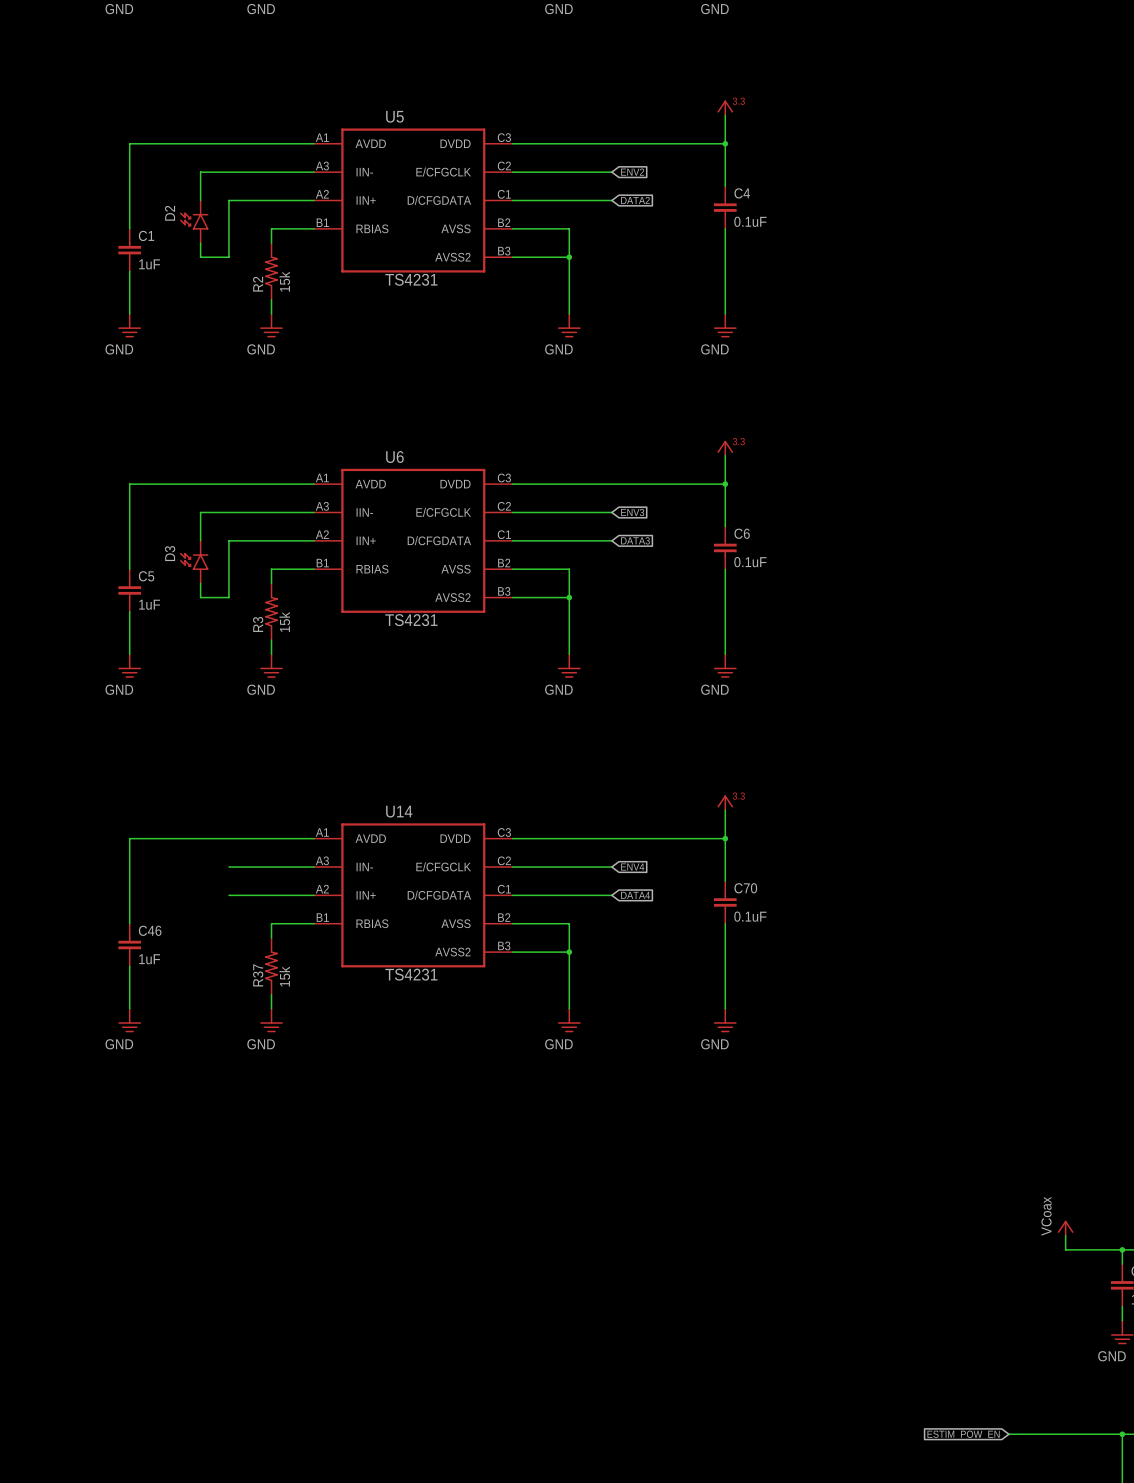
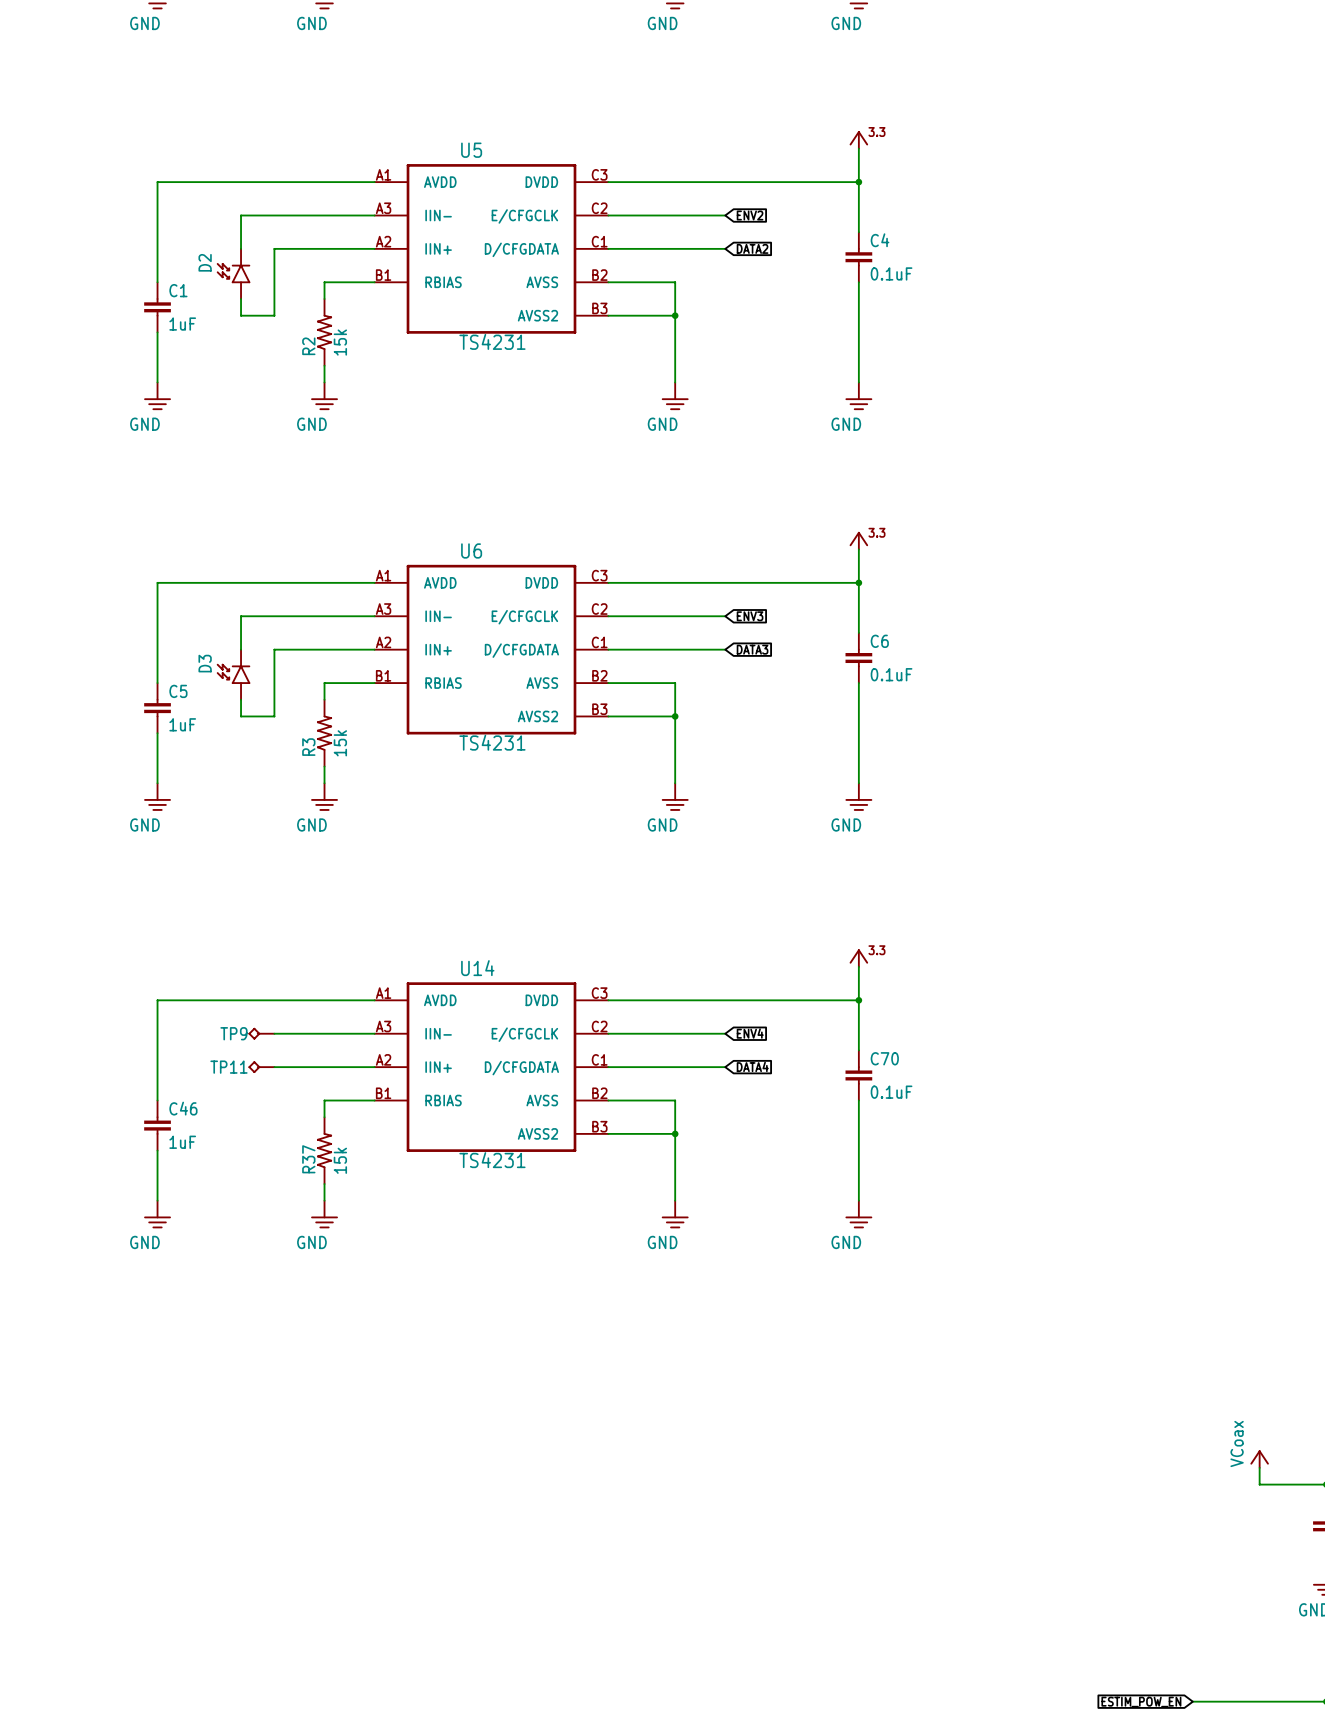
TP9: none -> (261, 1033)
TP11: none -> (261, 1067)

